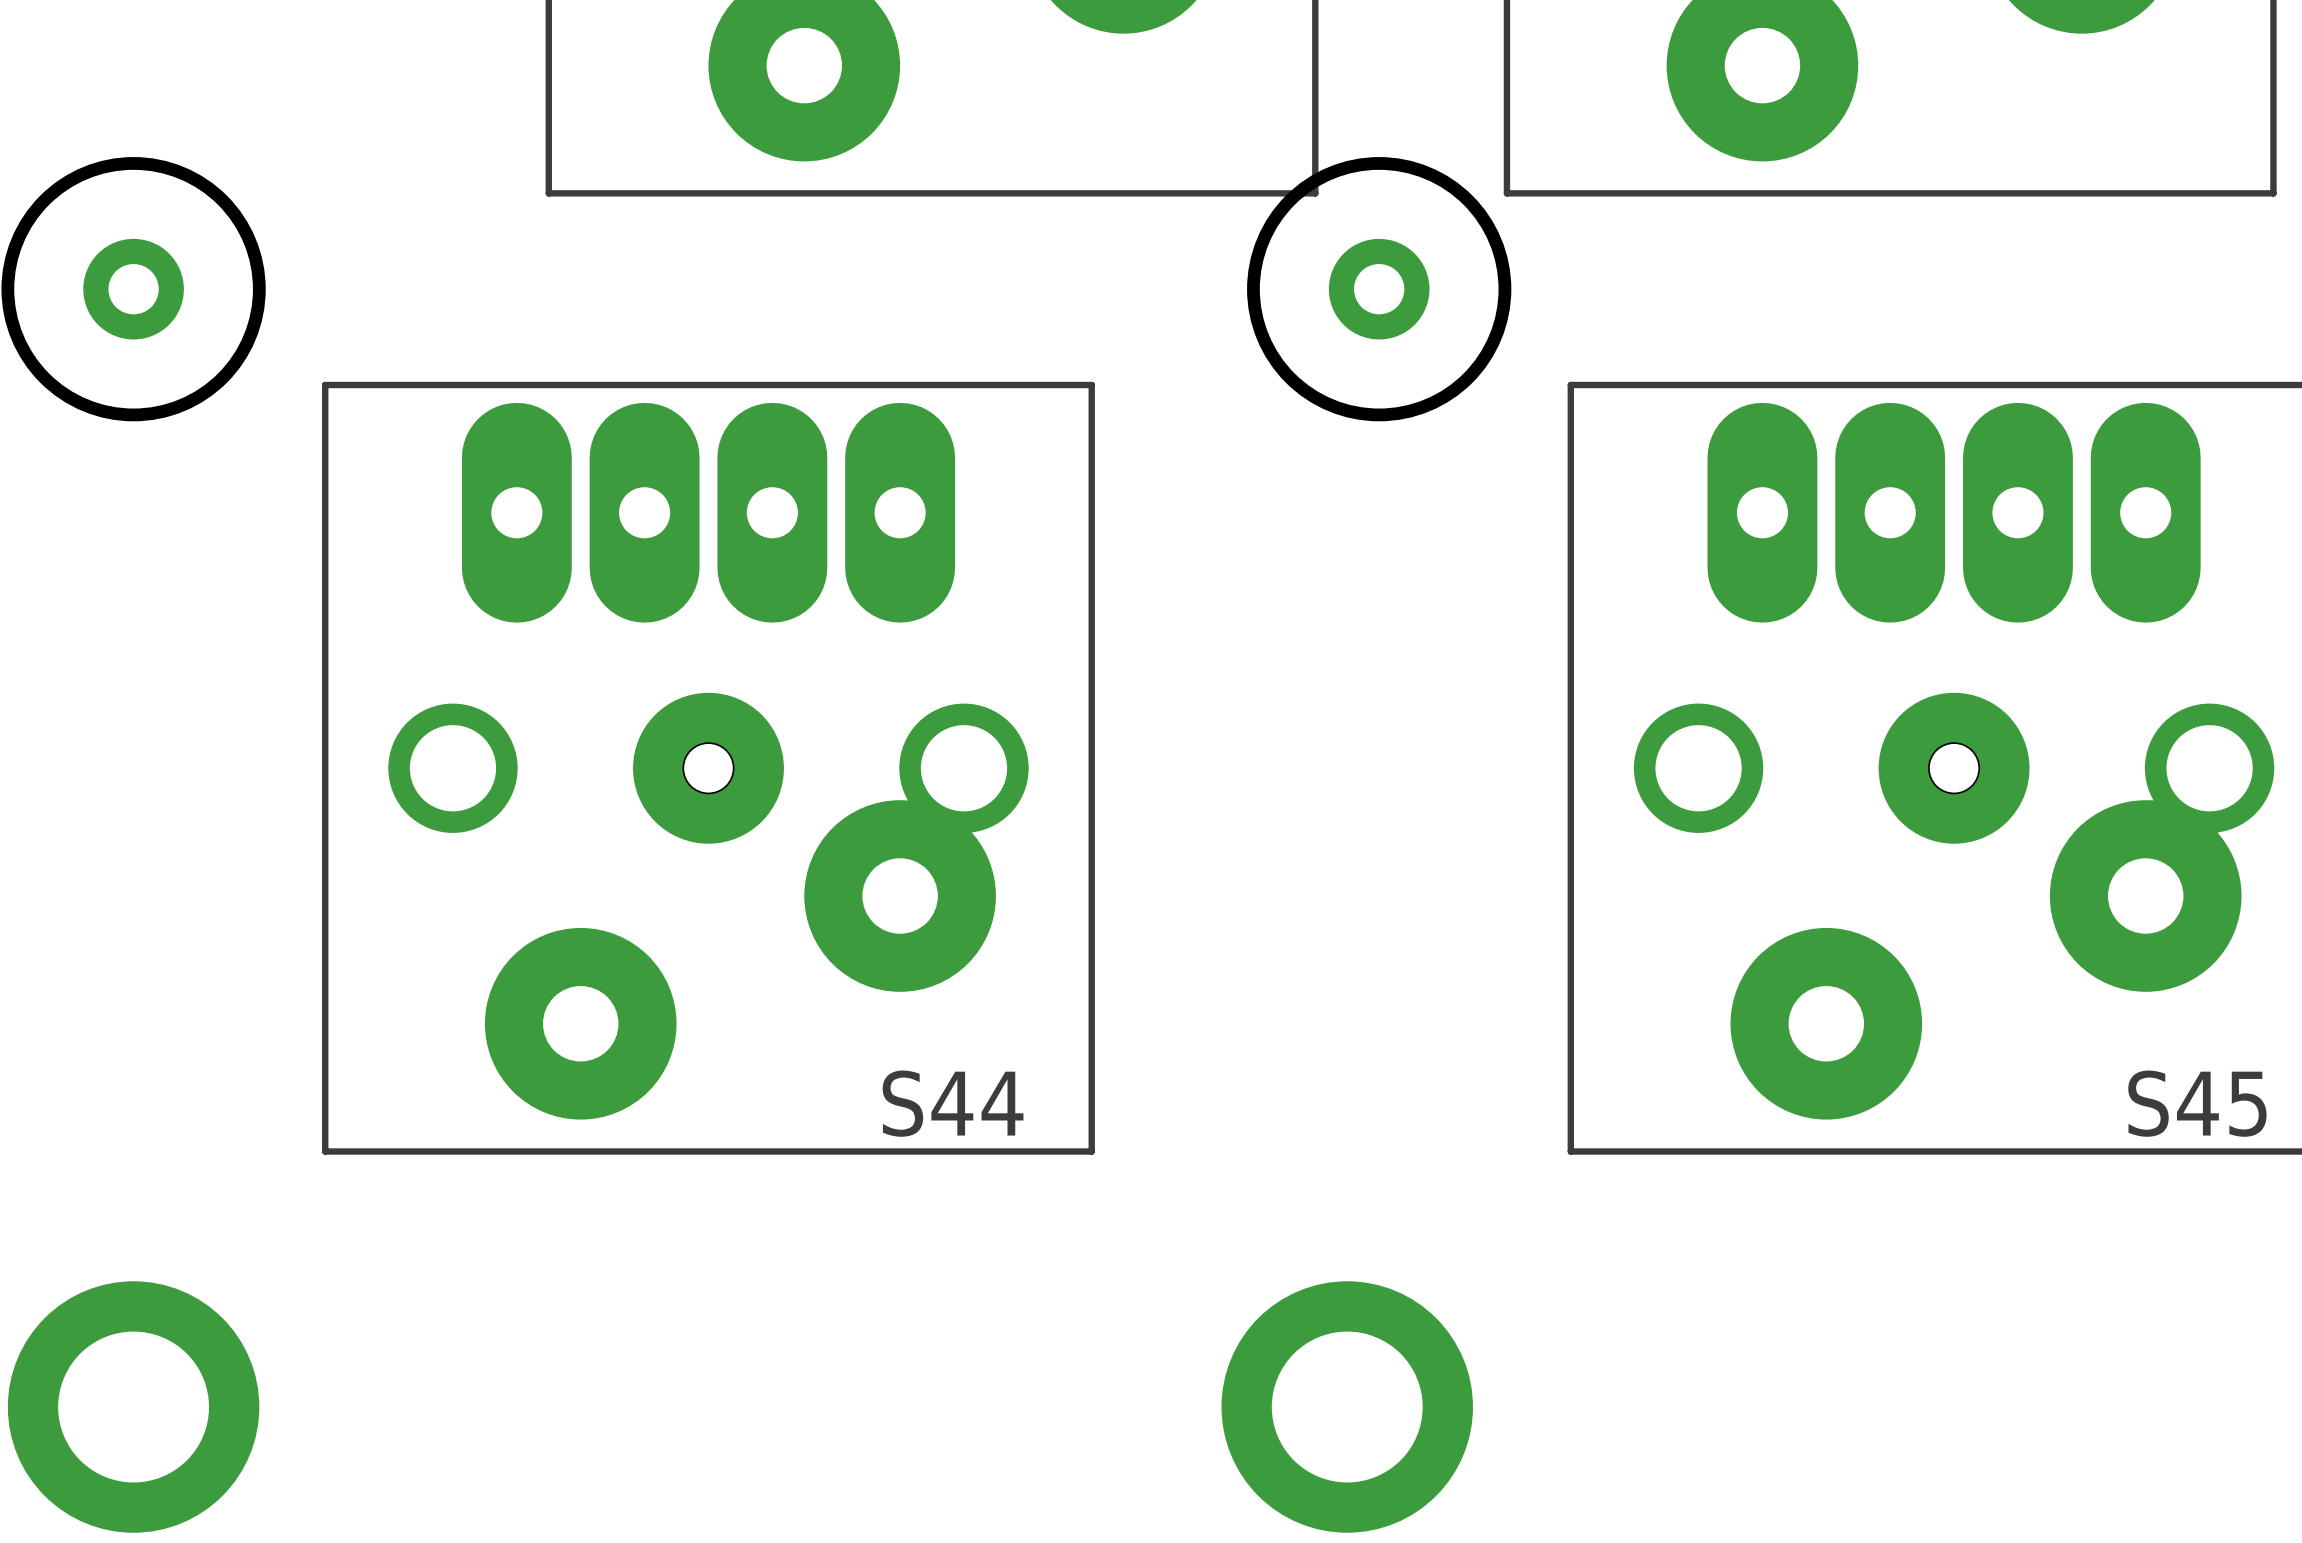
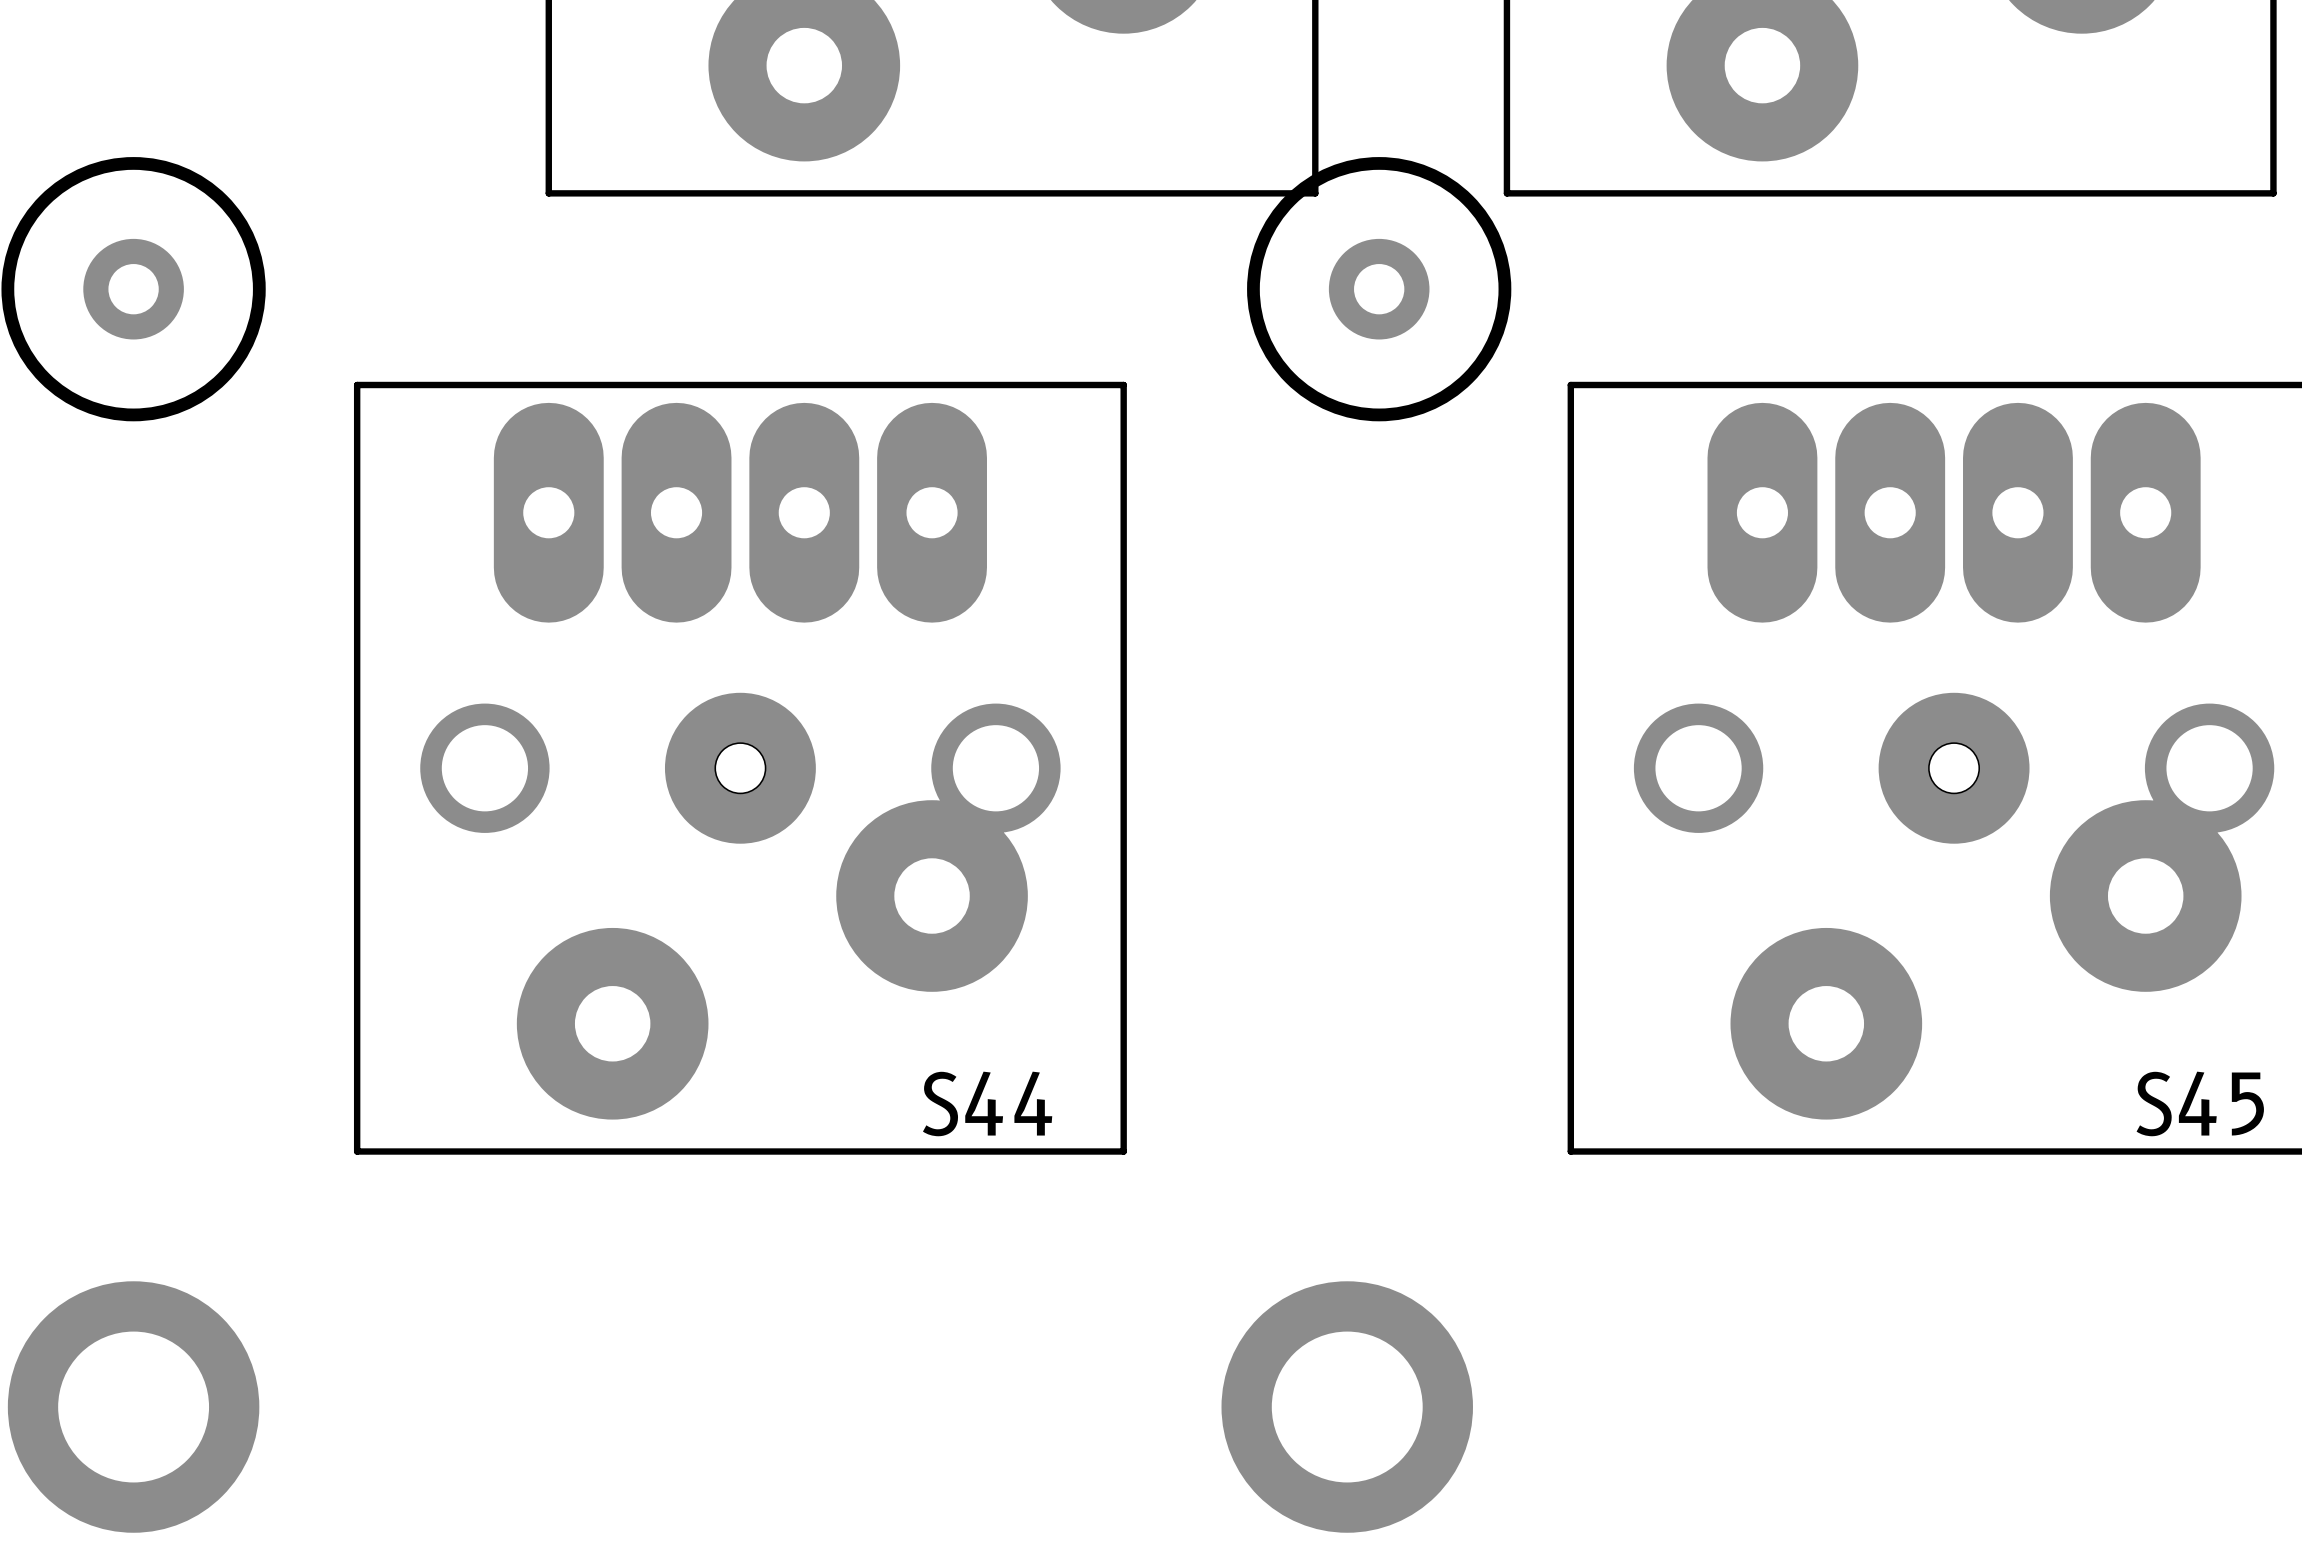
S44 position: (708, 768) -> (740, 768)

